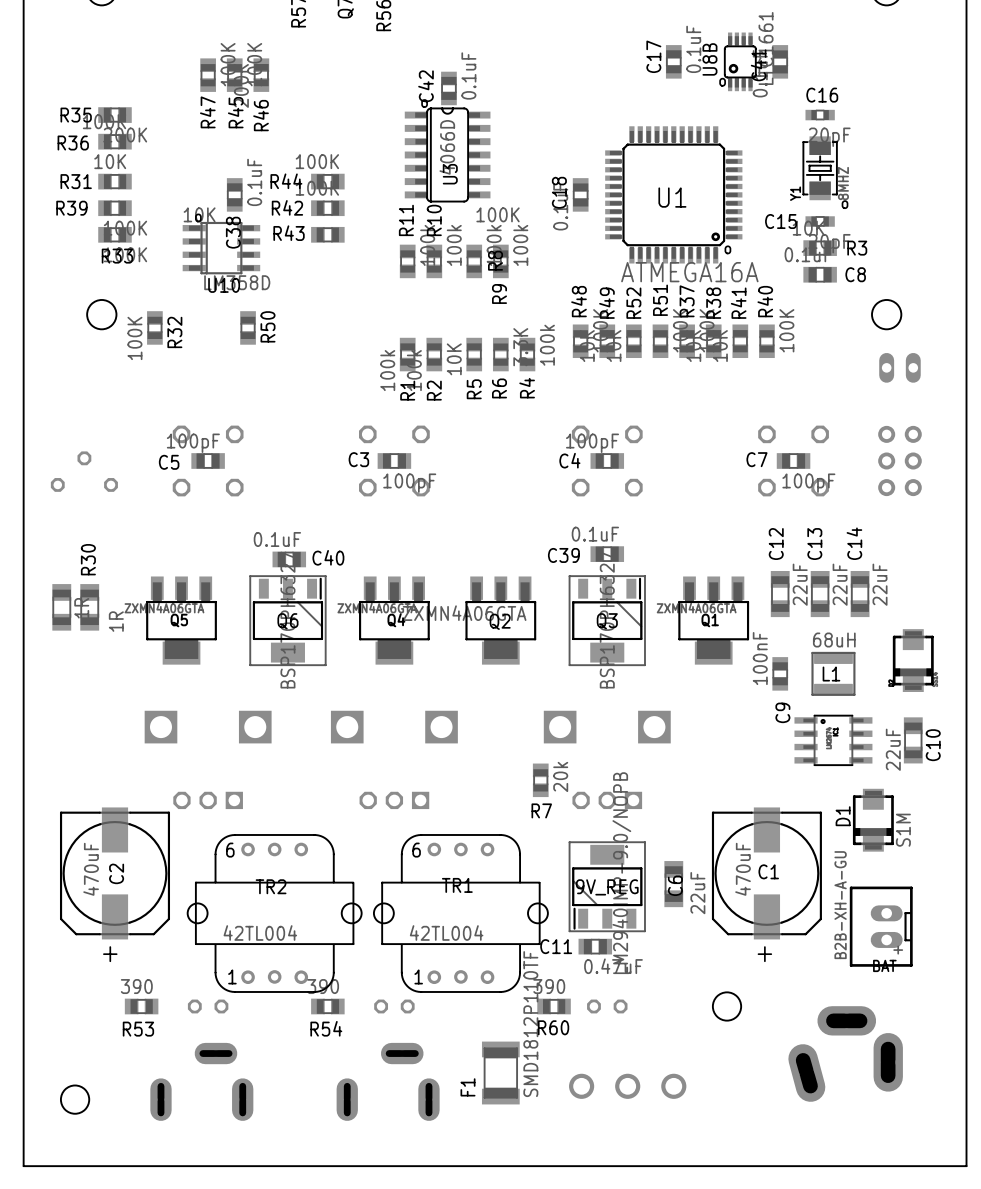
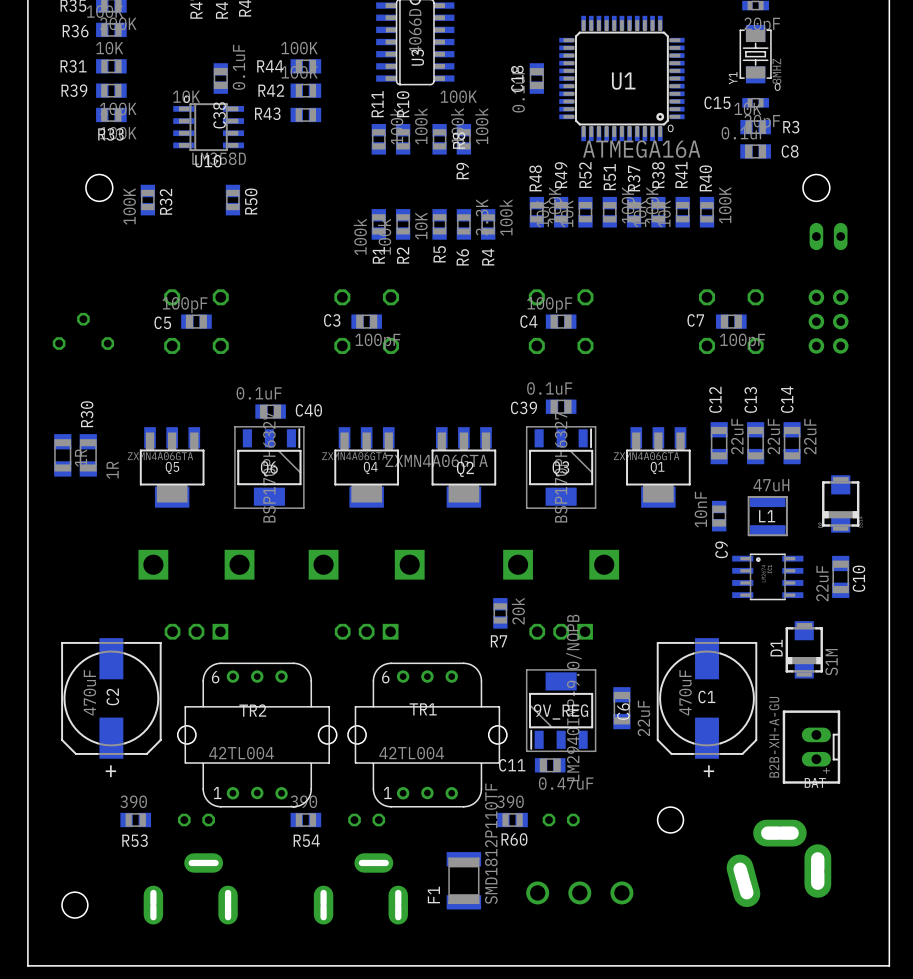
L1 value: 68uH (834, 640) -> 47uH (771, 485)
C9 value: 100nF (760, 658) -> 10nF (700, 509)

